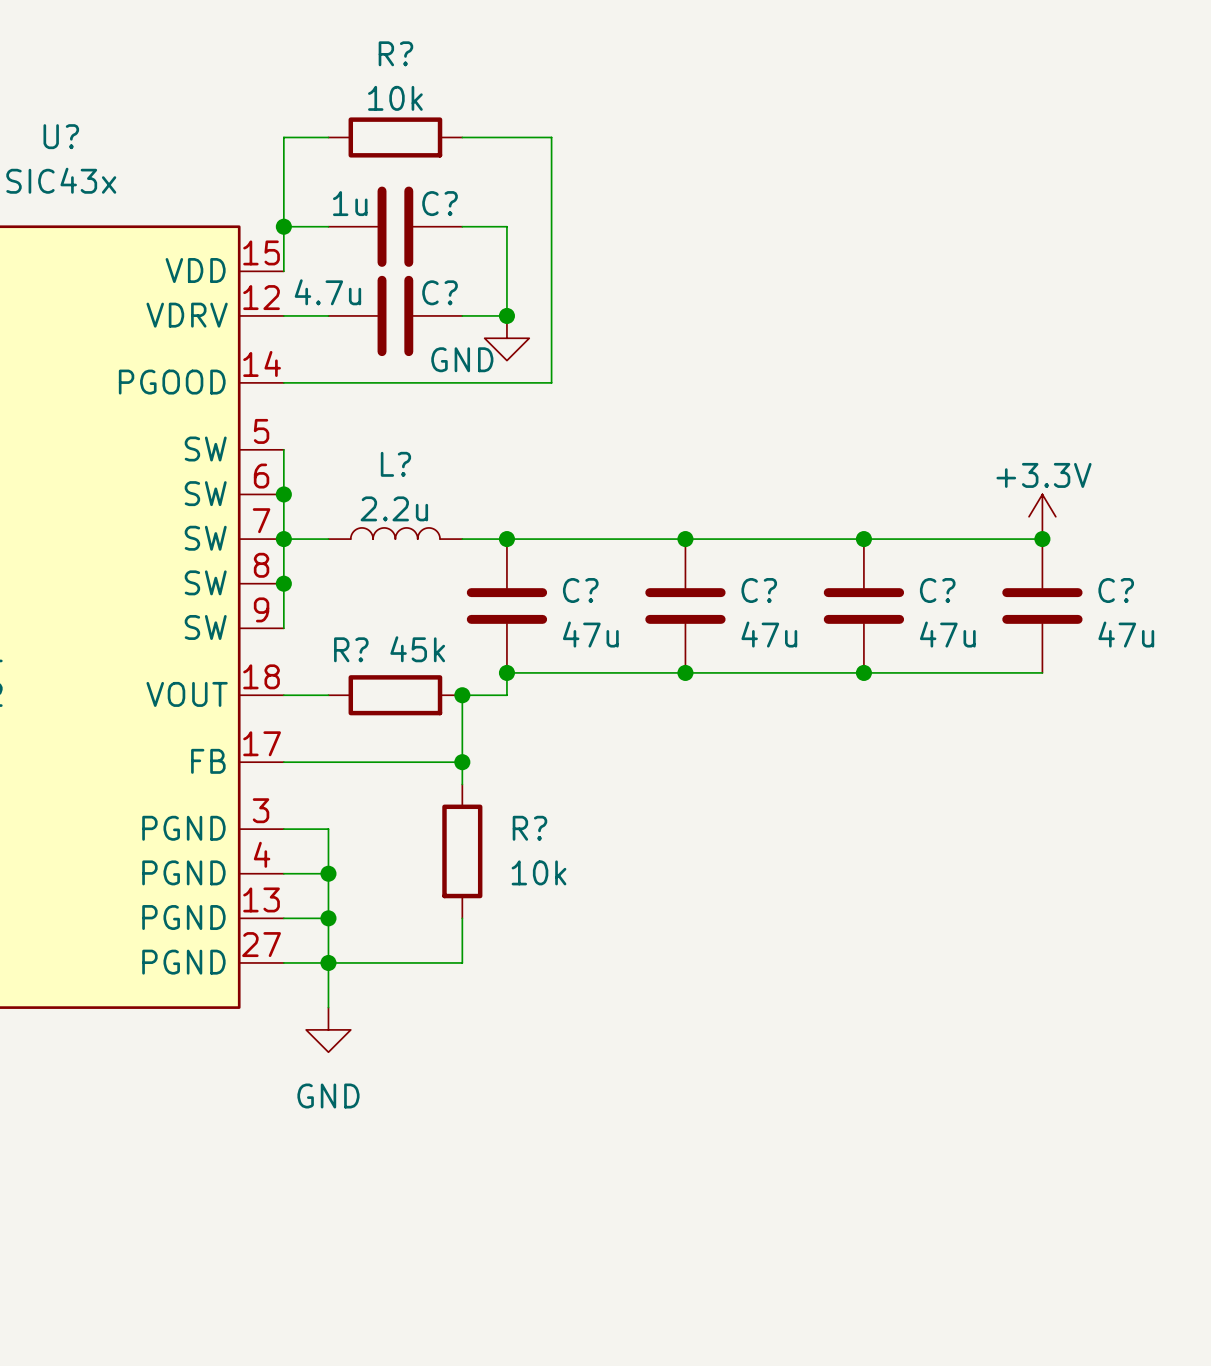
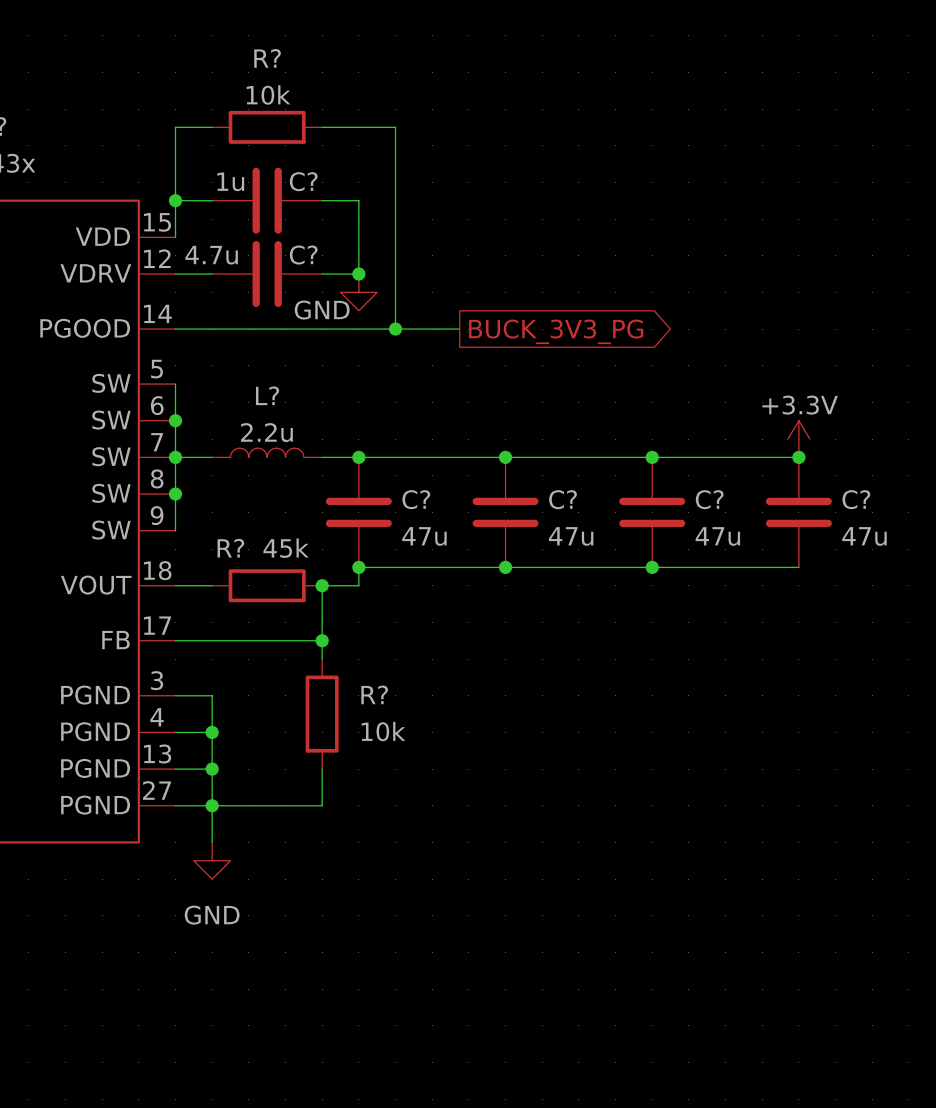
wire: none -> (395, 329) (459, 329)
junction: none -> (395, 329)
global label: none -> BUCK_3V3_PG (556, 331)

